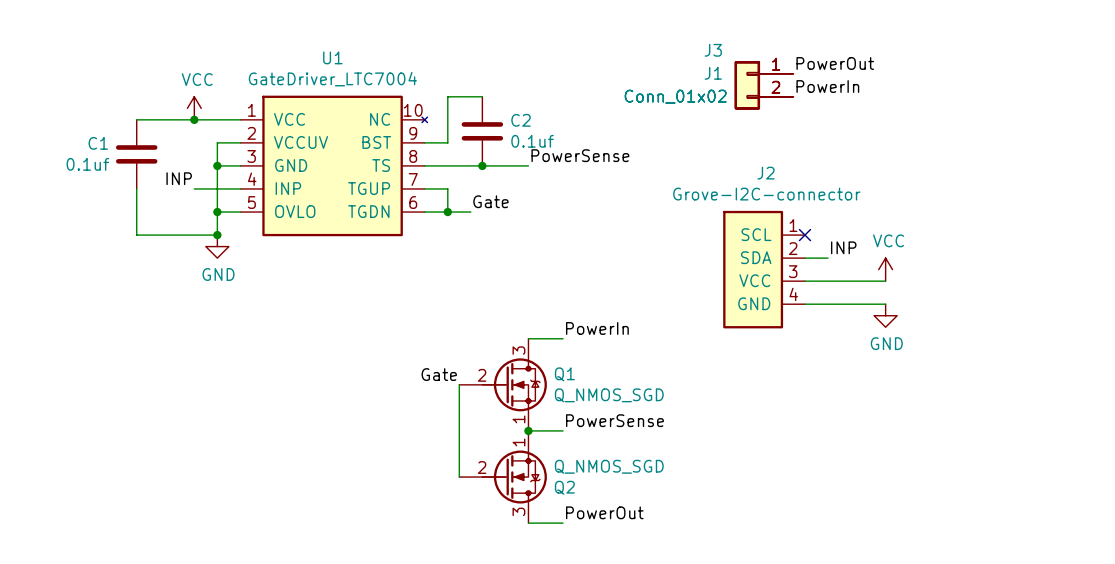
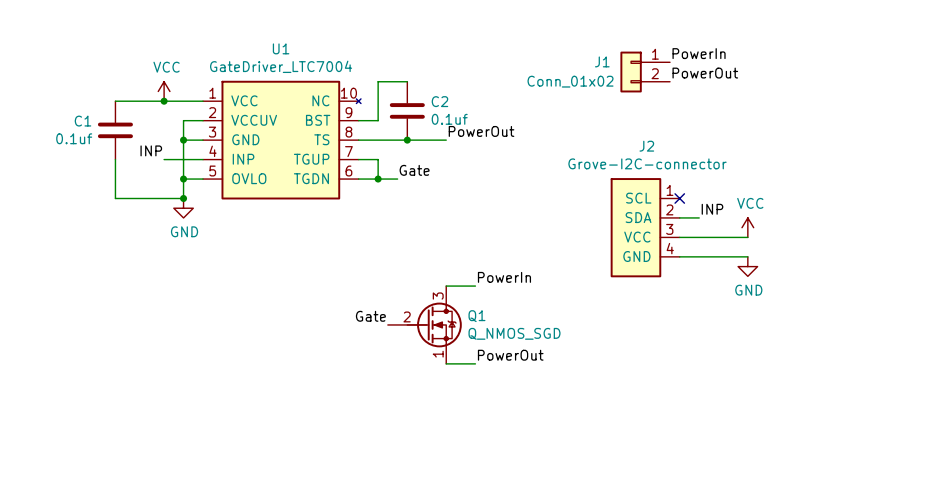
label: PowerOut (835, 63) -> PowerIn (699, 53)
J3: Conn_01x02 (764, 85) -> none
label: PowerIn (827, 86) -> PowerOut (705, 73)
label: PowerSense (580, 155) -> PowerOut (481, 131)
wire: (459, 384) (459, 477) -> none
label: PowerSense (614, 420) -> PowerOut (510, 355)
junction: (528, 430) -> none
Q2: Q_NMOS_SGD (503, 477) -> none
label: PowerOut (604, 512) -> none
wire: (528, 523) (563, 523) -> none

